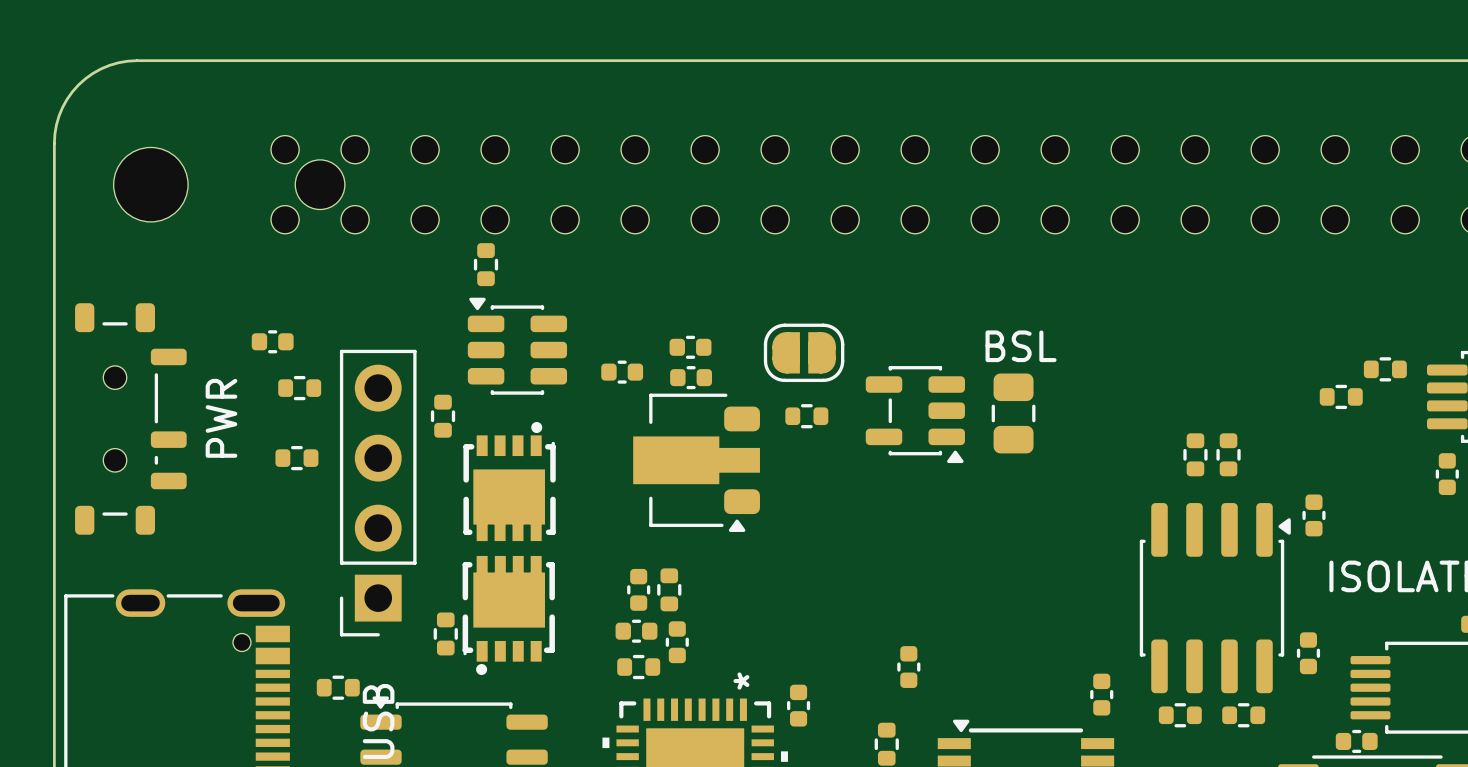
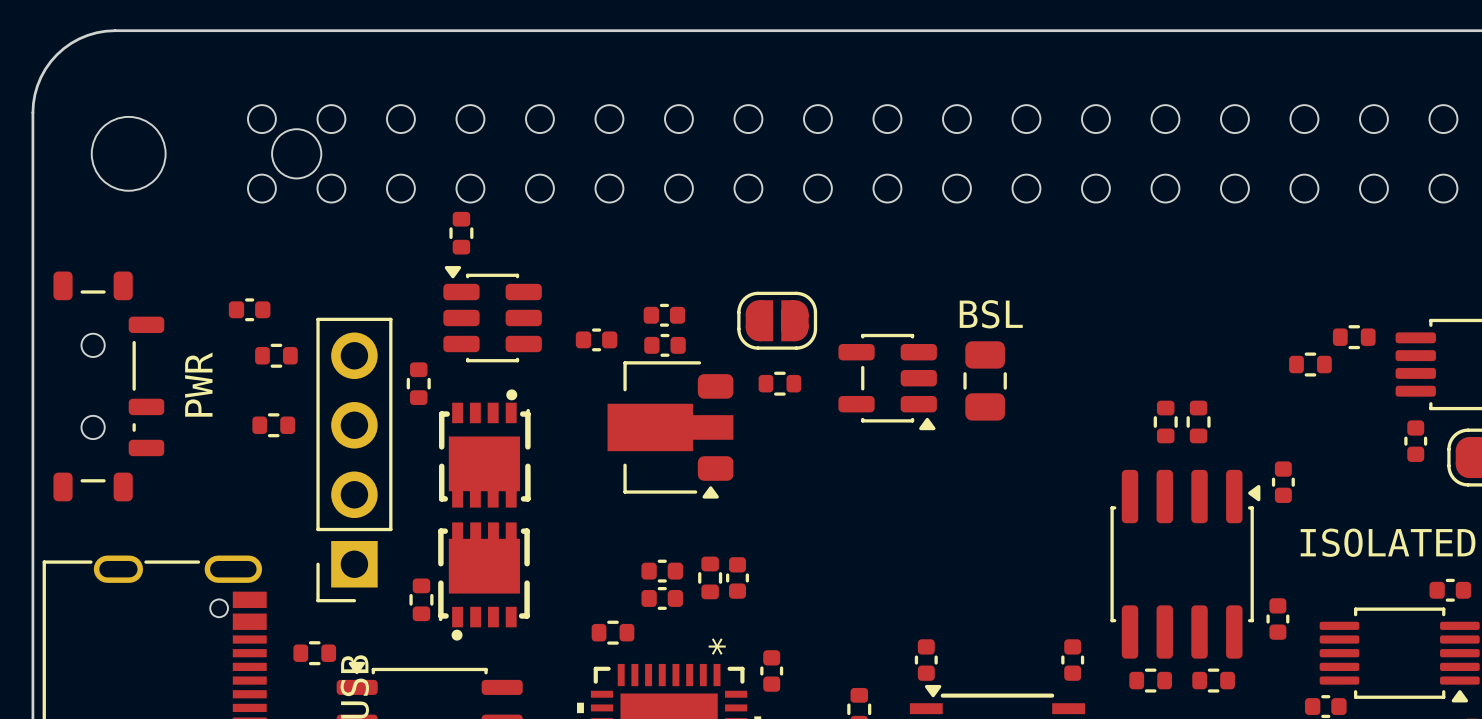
part: (638, 589) -> none
part position: (669, 589) -> (710, 577)
part: none -> (662, 571)
part: none -> (737, 577)
part: (636, 631) -> none
part rotation: 0° (677, 642) -> 90° clockwise (662, 598)
part position: (908, 667) -> (926, 660)

